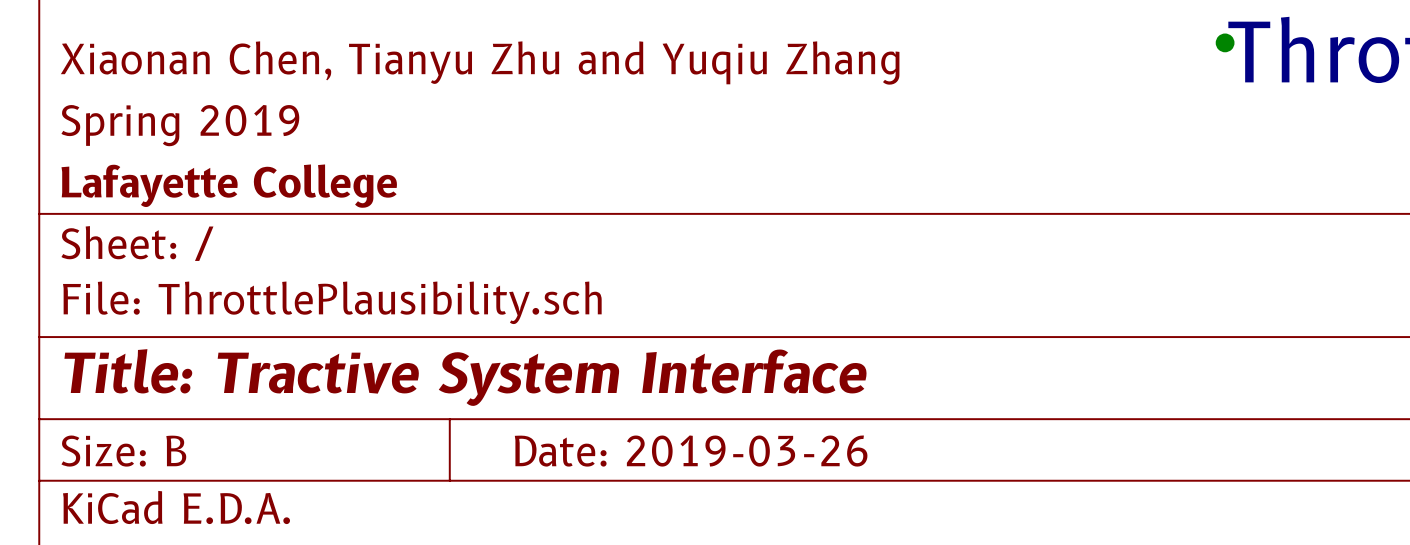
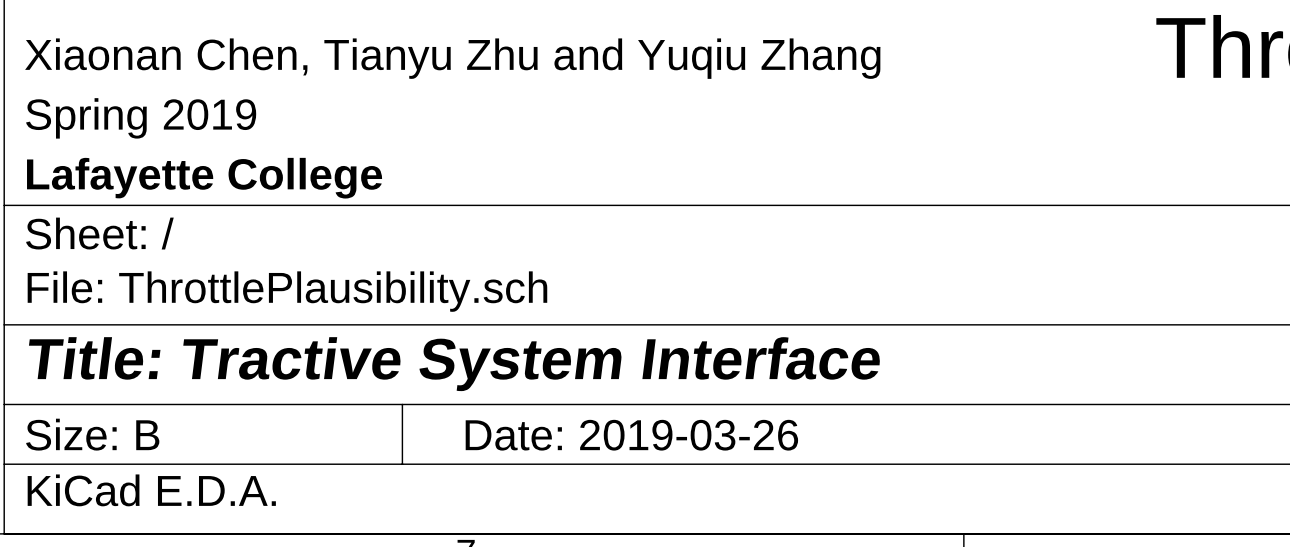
junction: (1225, 42) -> none

